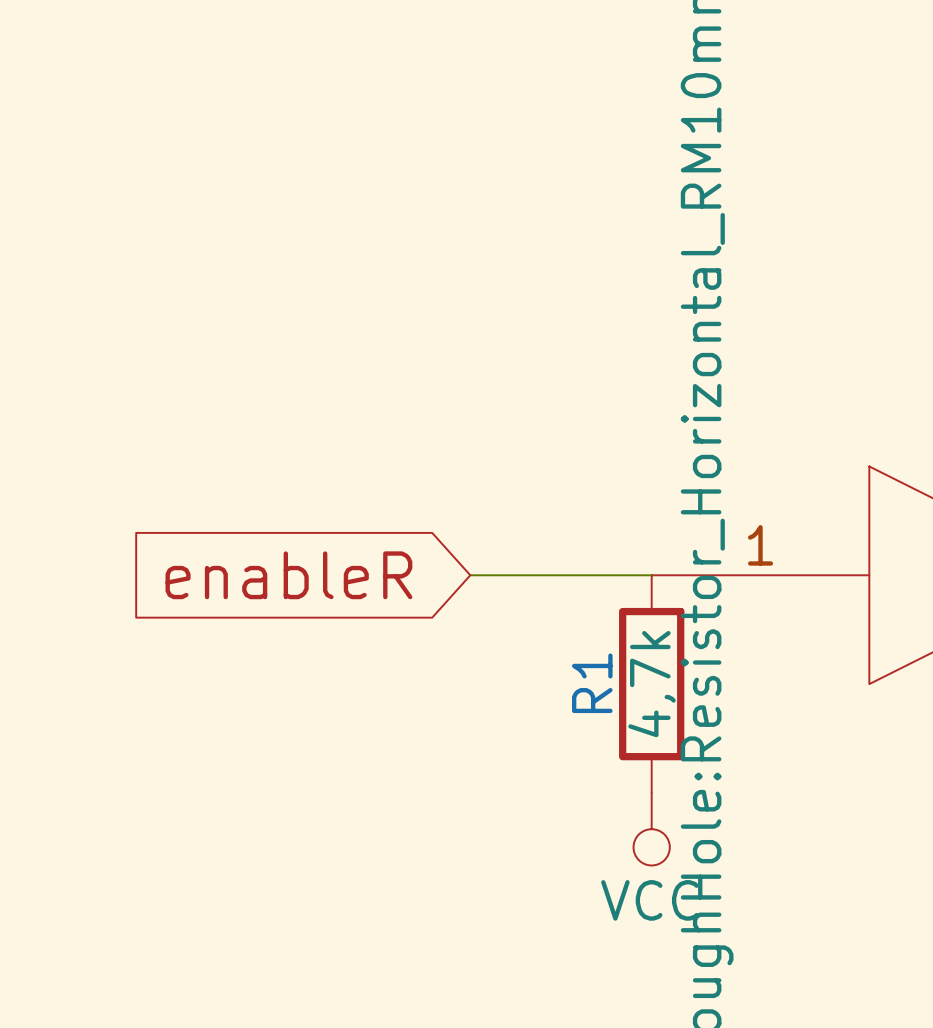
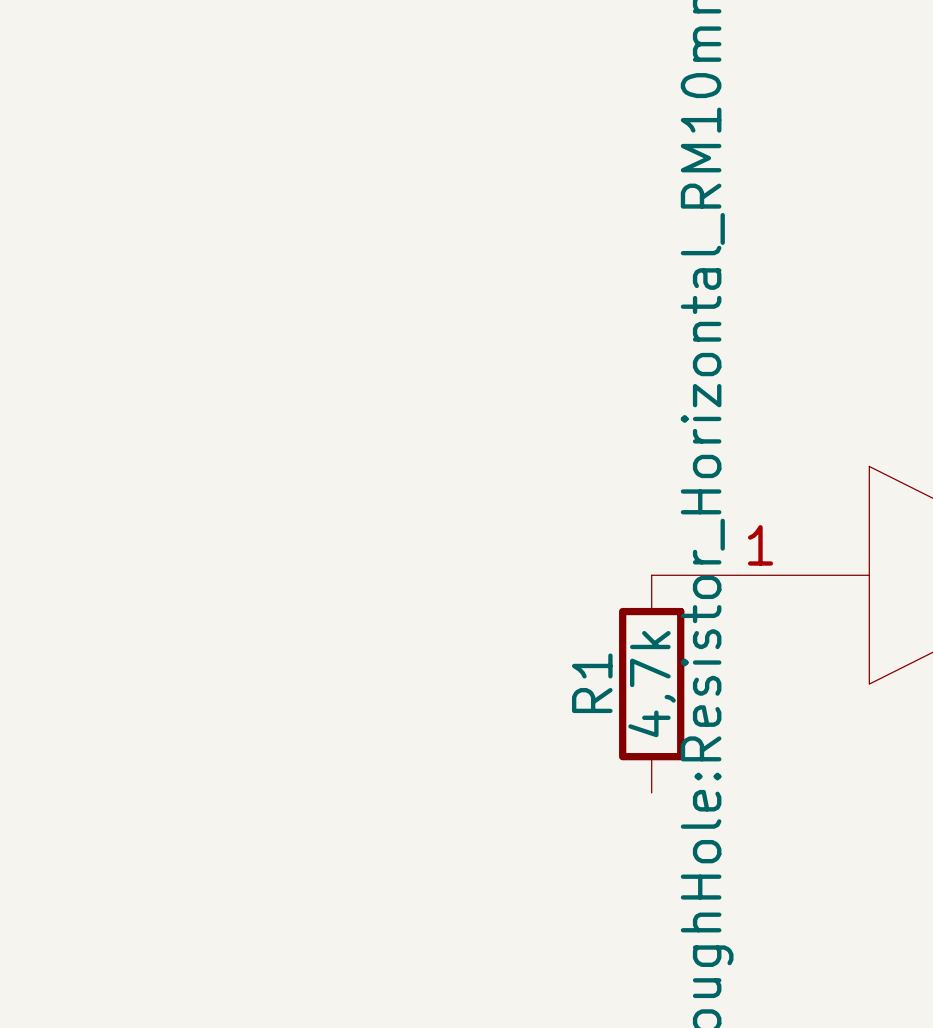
global label: enableR (288, 575) -> none
wire: (470, 575) (651, 575) -> none
power symbol: VCC (651, 829) -> none

